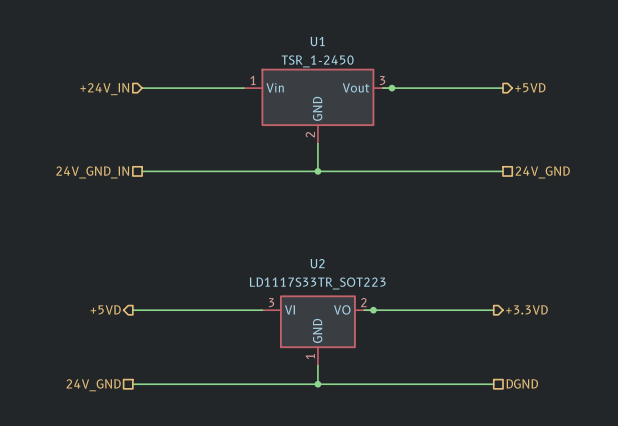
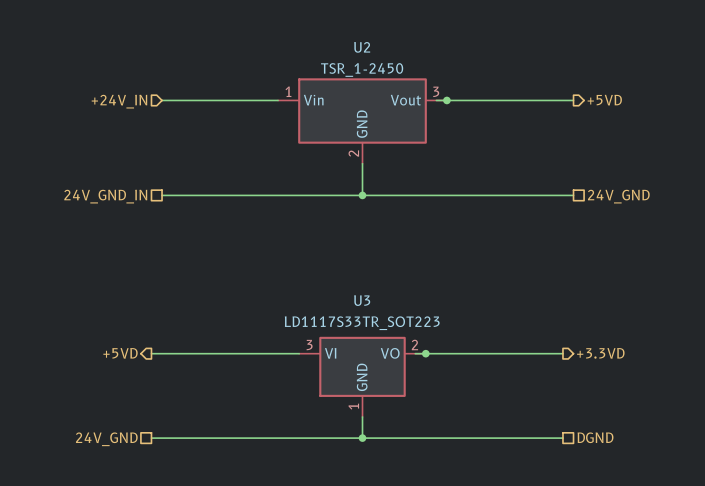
U1 name: U1 (317, 41) -> U2 (362, 47)
U2 name: U2 (317, 263) -> U3 (362, 300)

